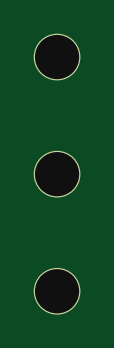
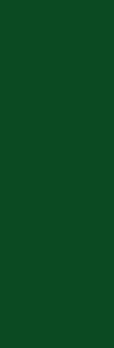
part: (57, 57) -> none
part: (57, 174) -> none
part: (57, 291) -> none

